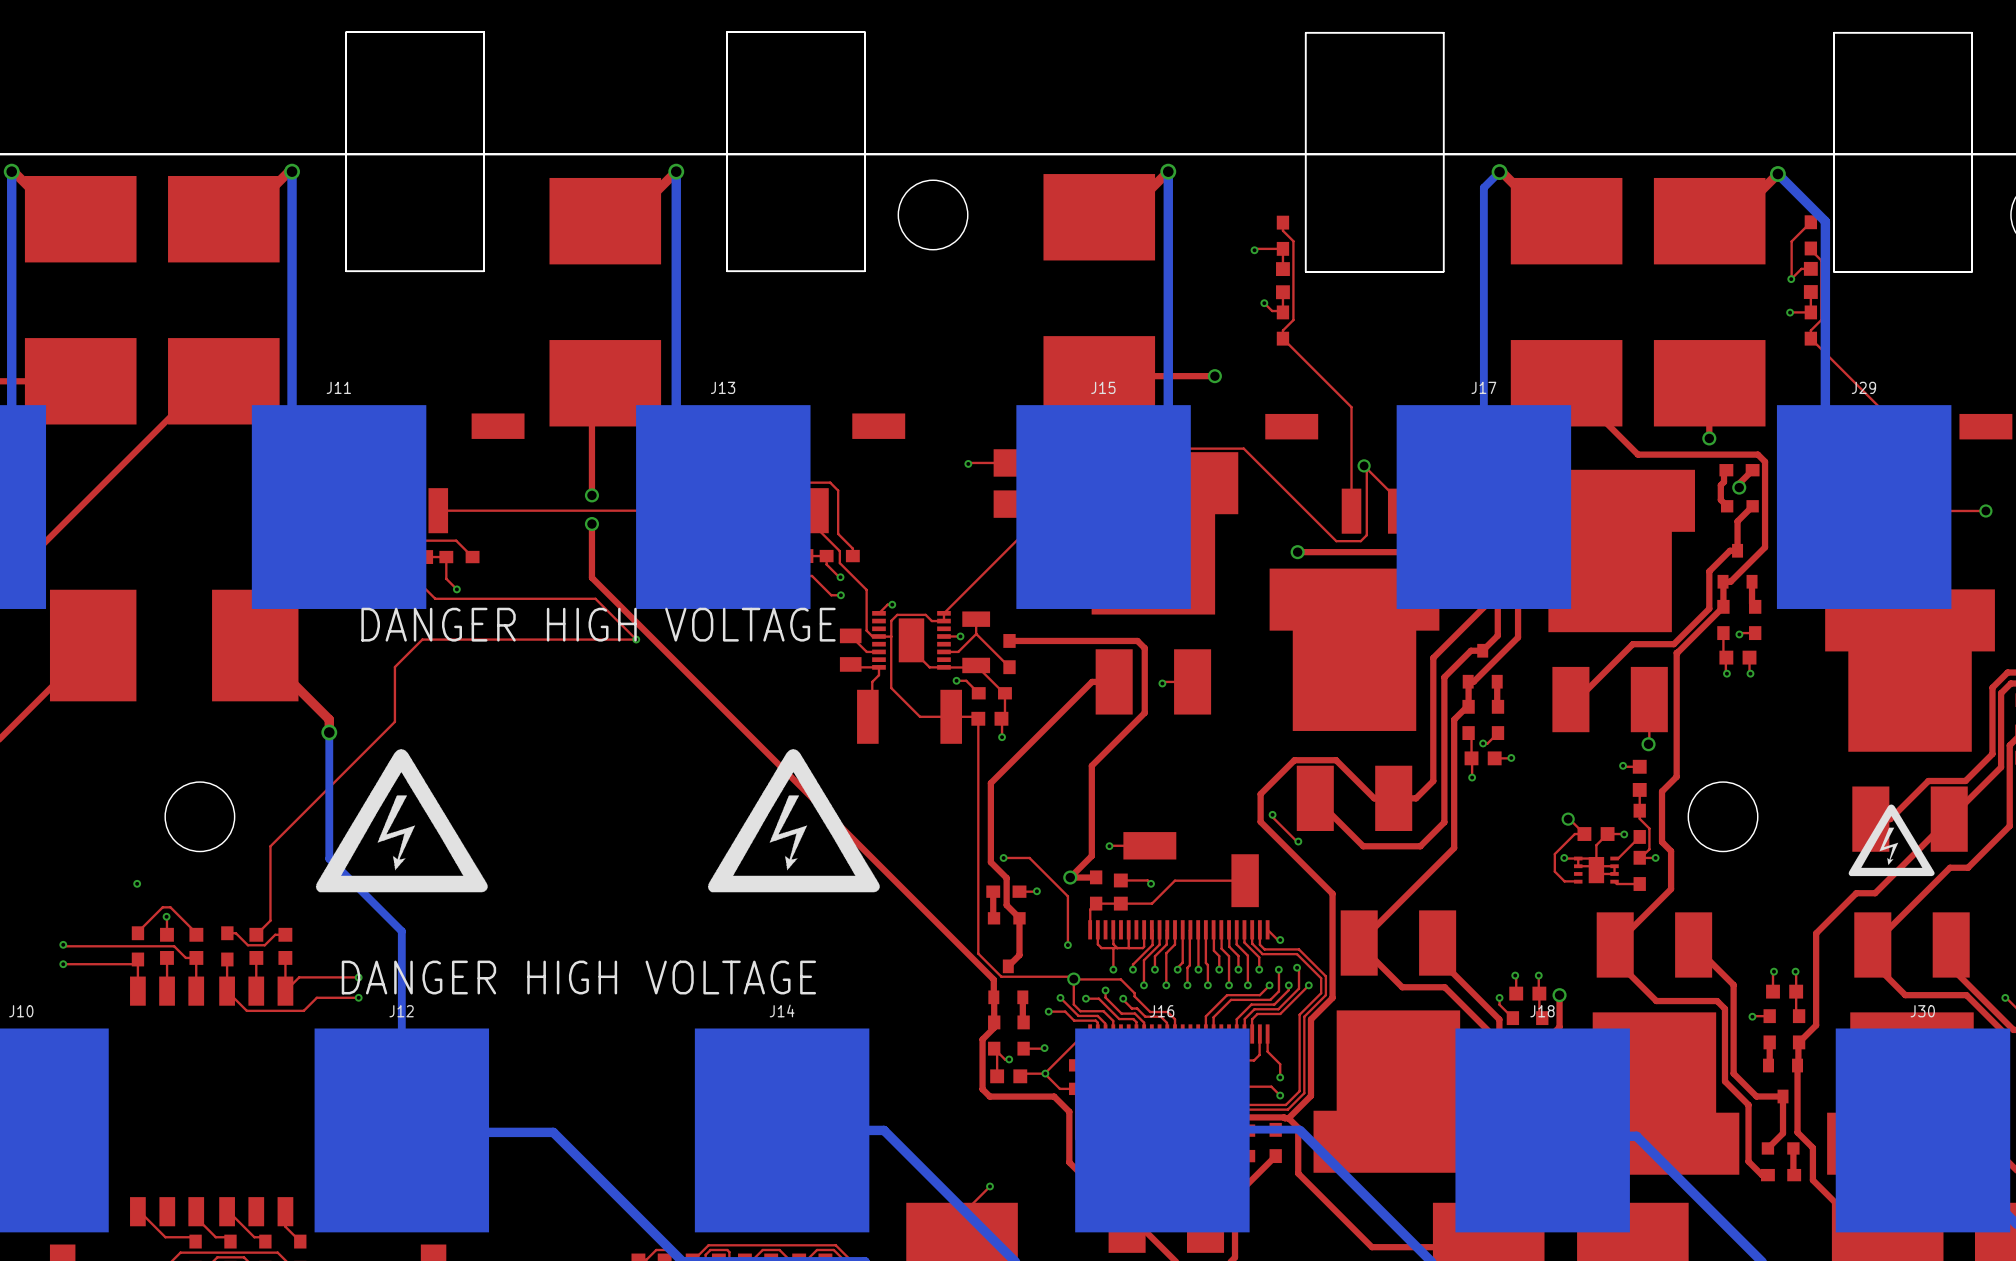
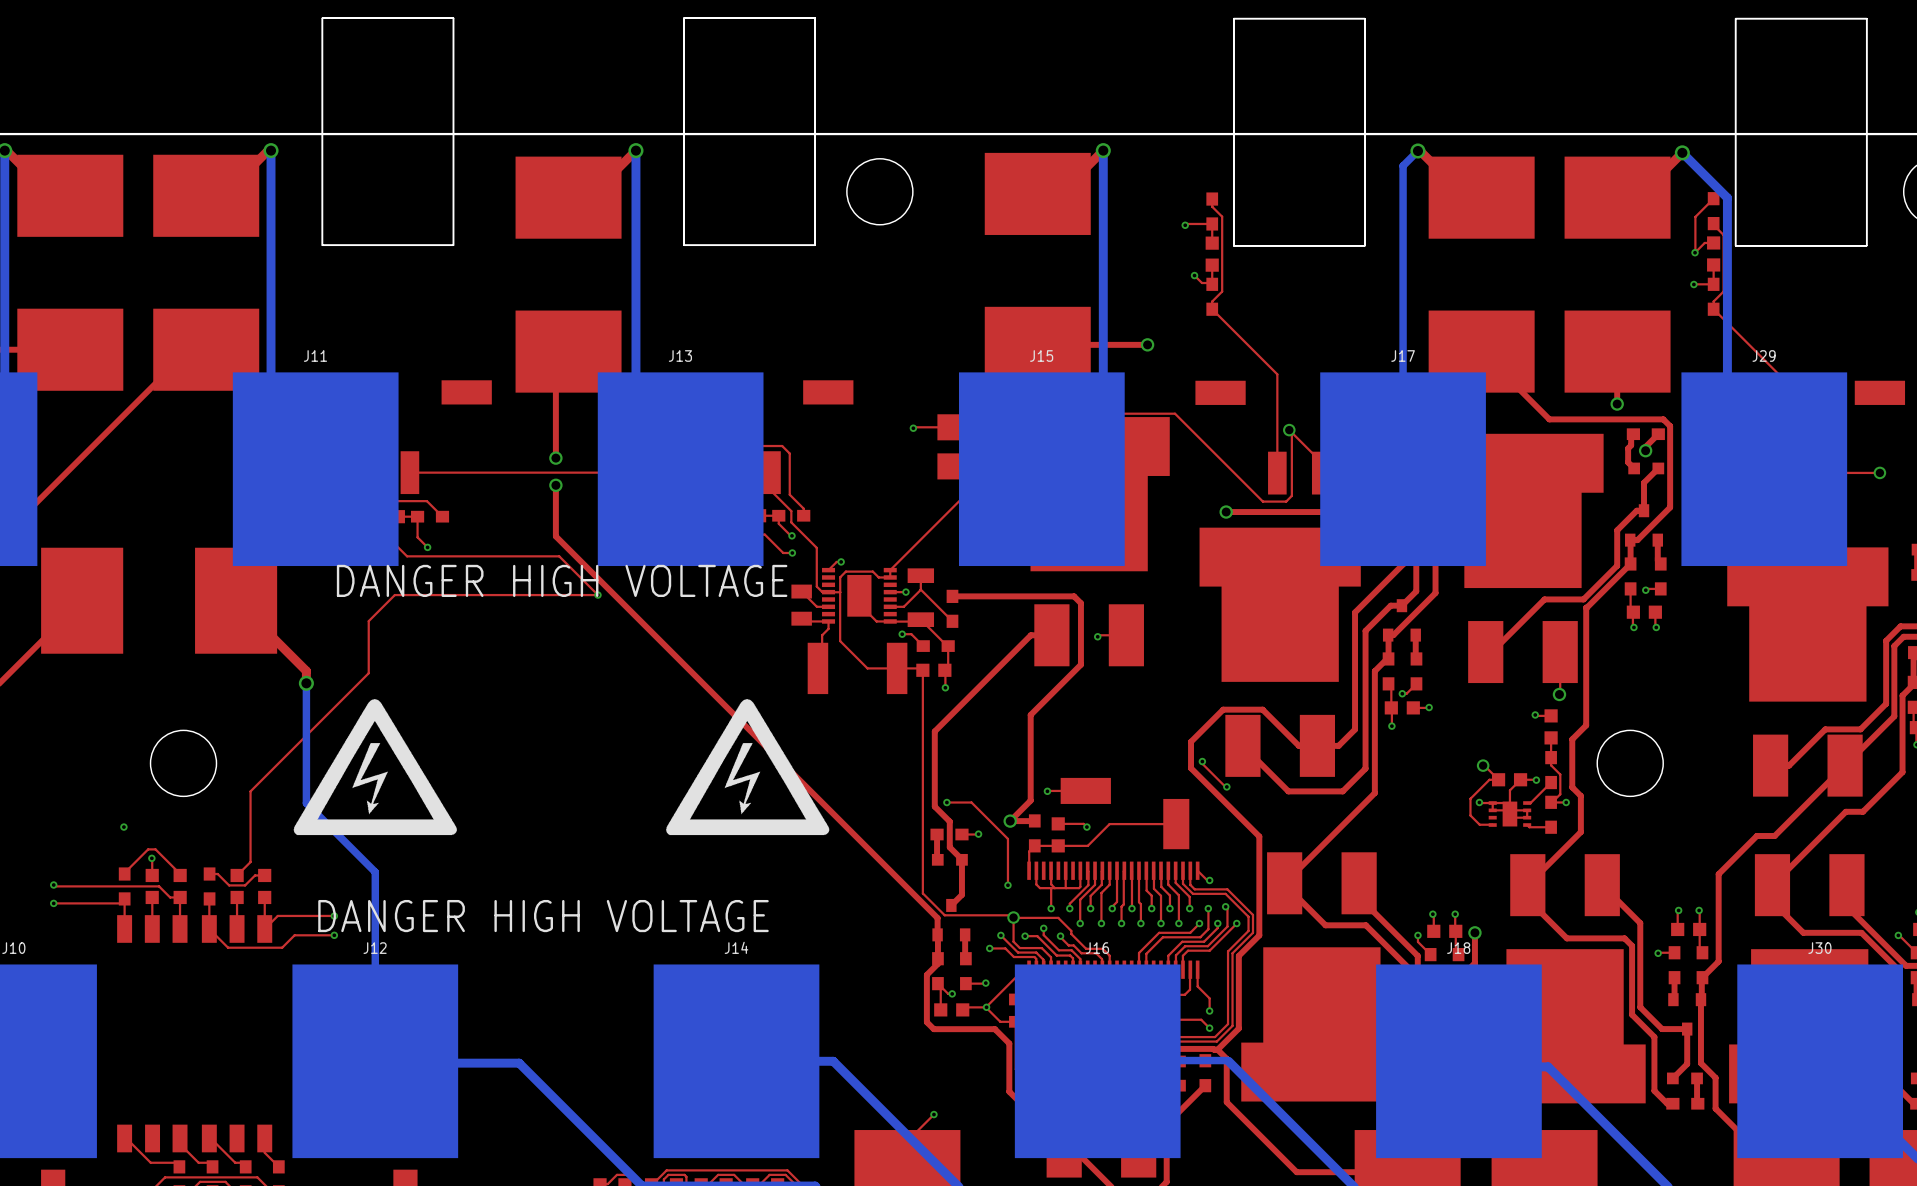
drawing: [1848, 804, 1935, 877] -> none

